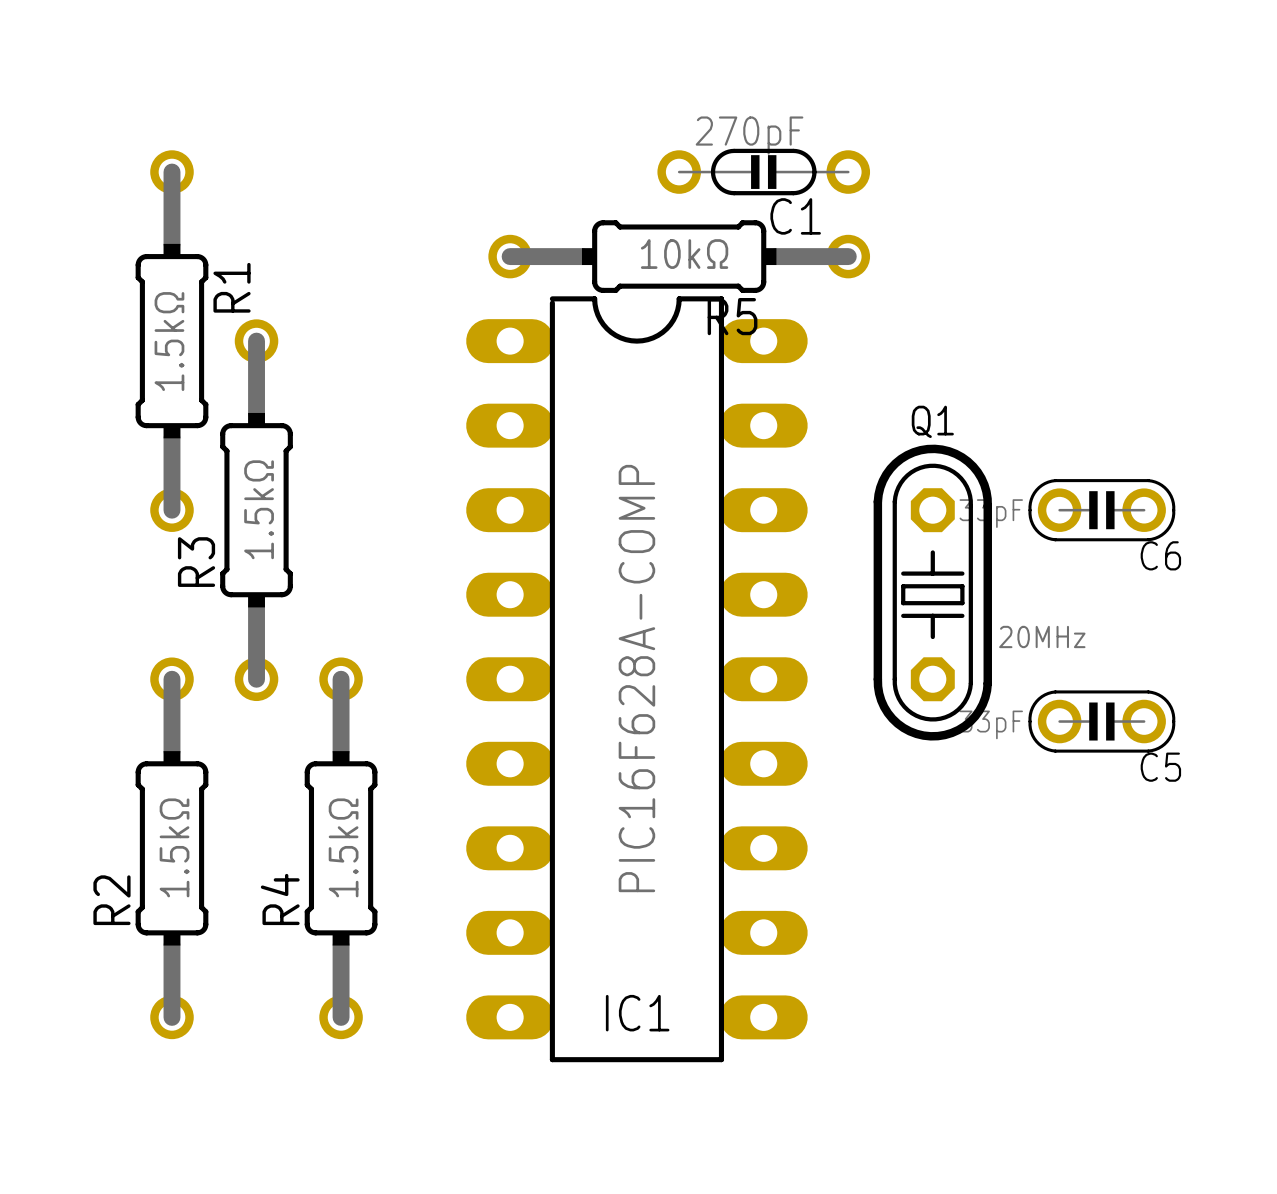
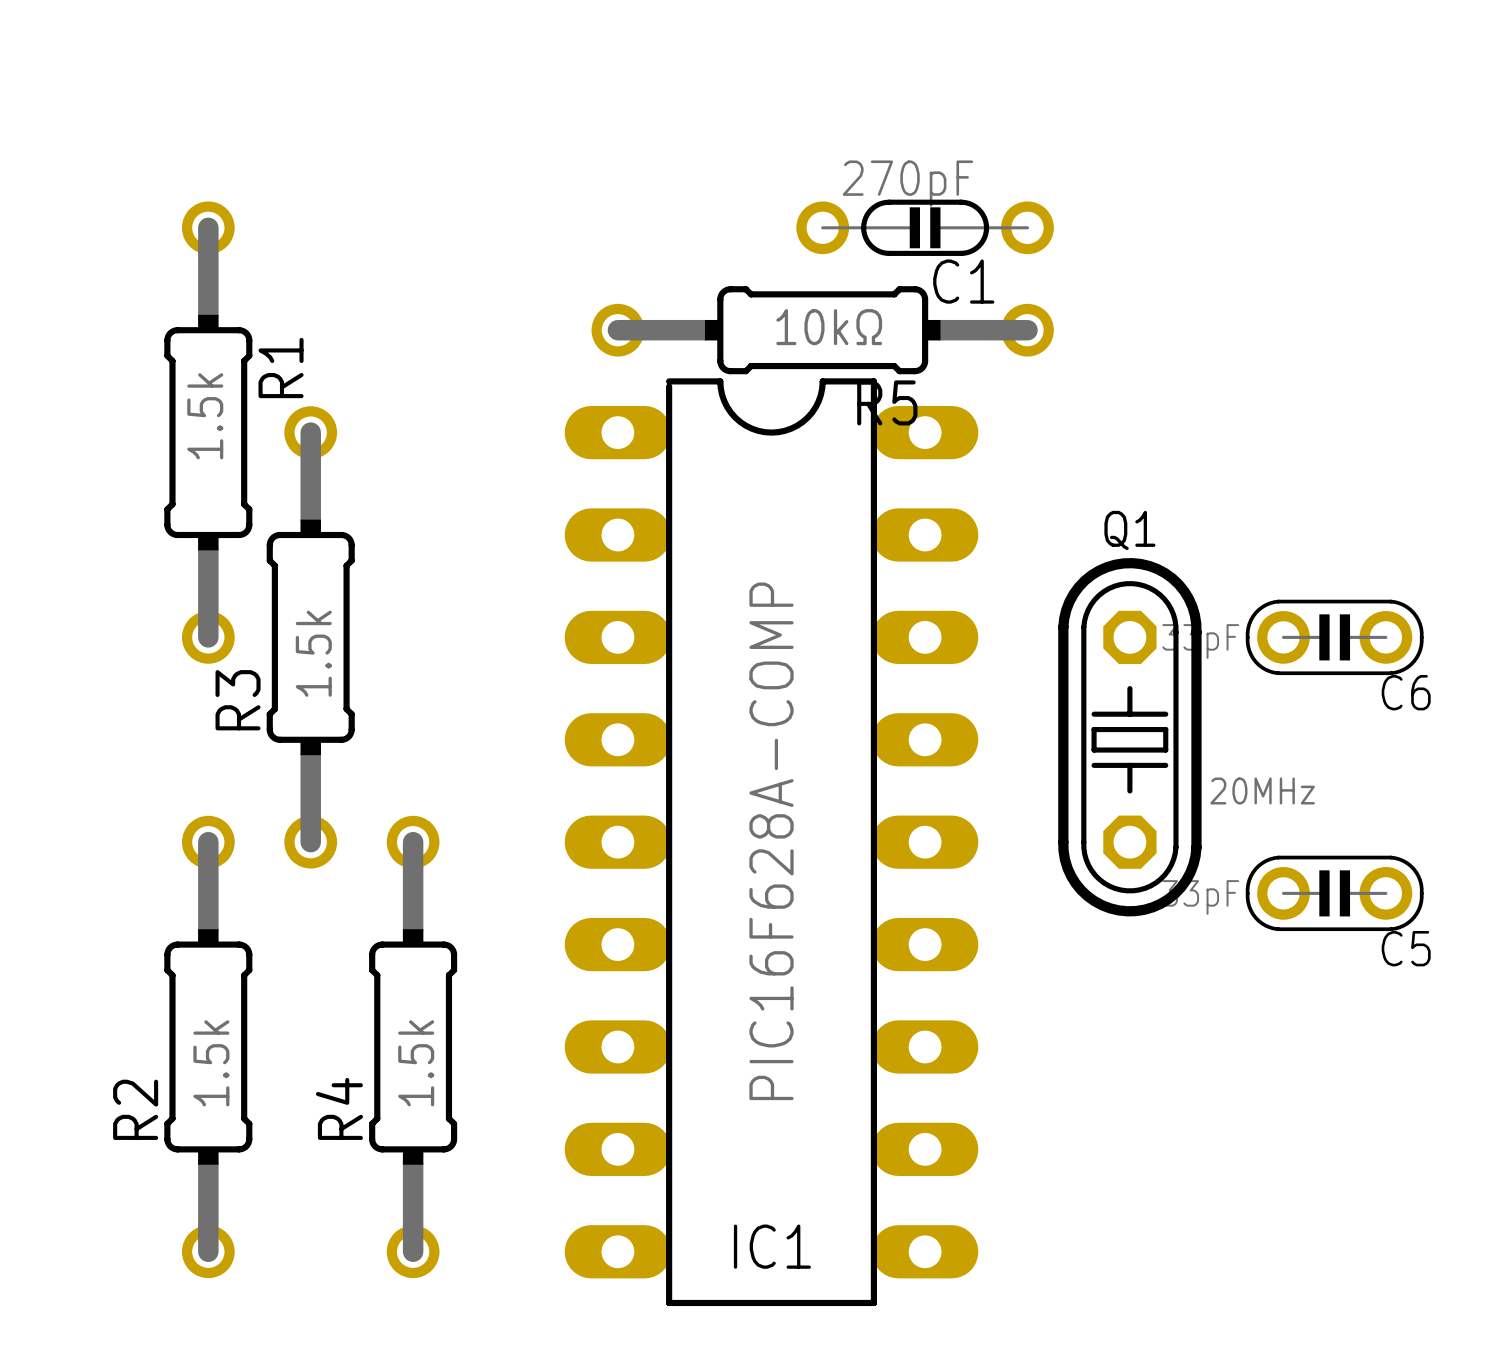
R1 value: 1.5kΩ (169, 341) -> 1.5k (205, 416)
R3 value: 1.5kΩ (259, 509) -> 1.5k (313, 653)
R2 value: 1.5kΩ (174, 847) -> 1.5k (211, 1063)
R4 value: 1.5kΩ (343, 847) -> 1.5k (416, 1063)

